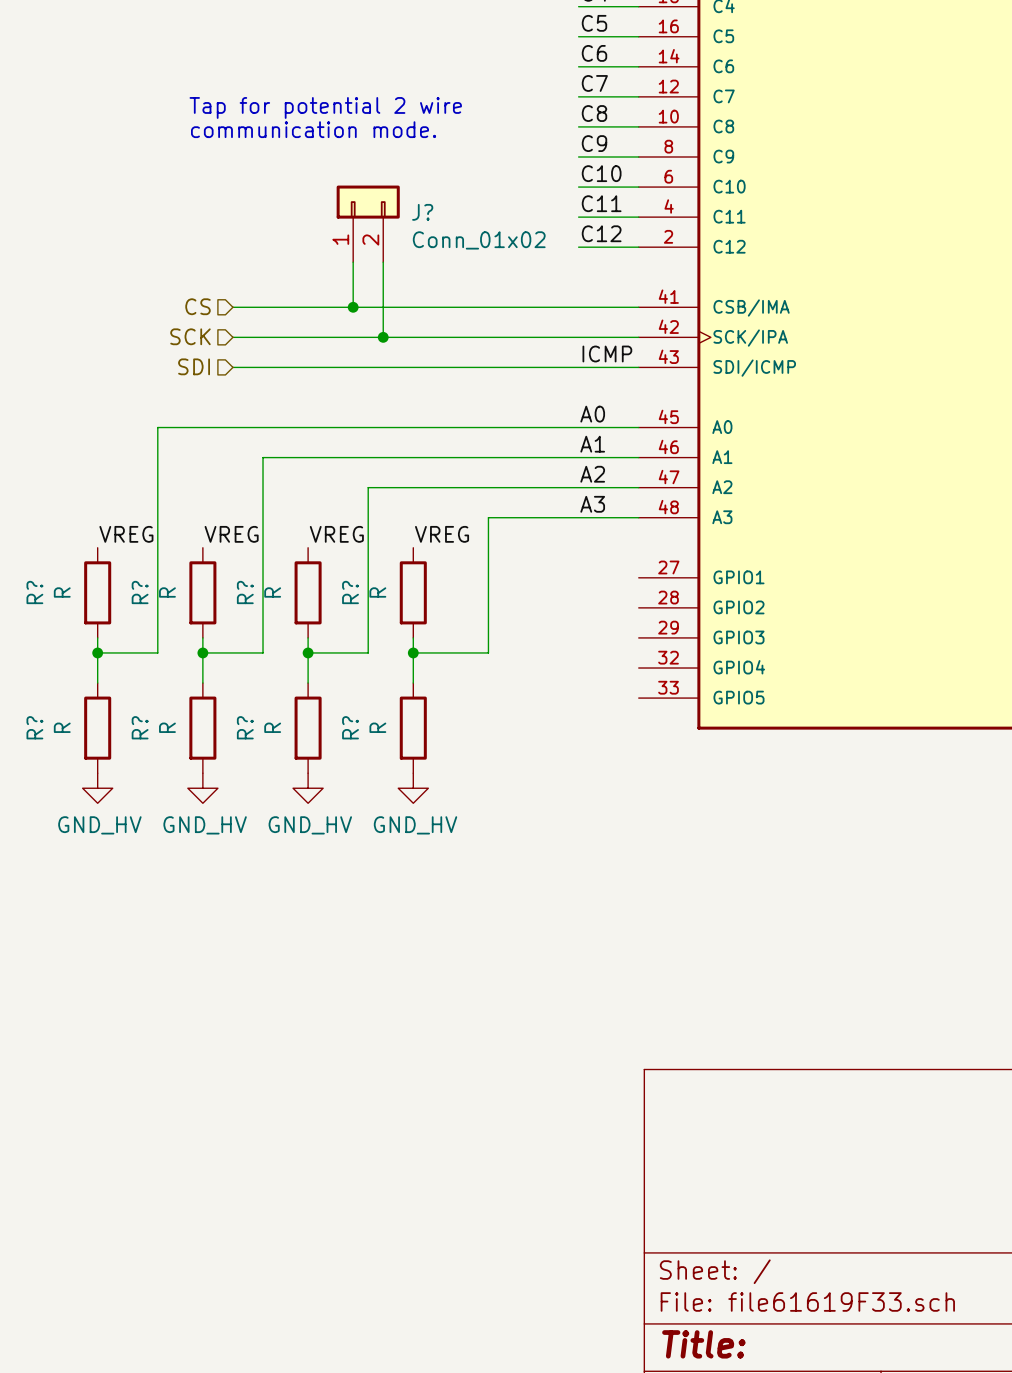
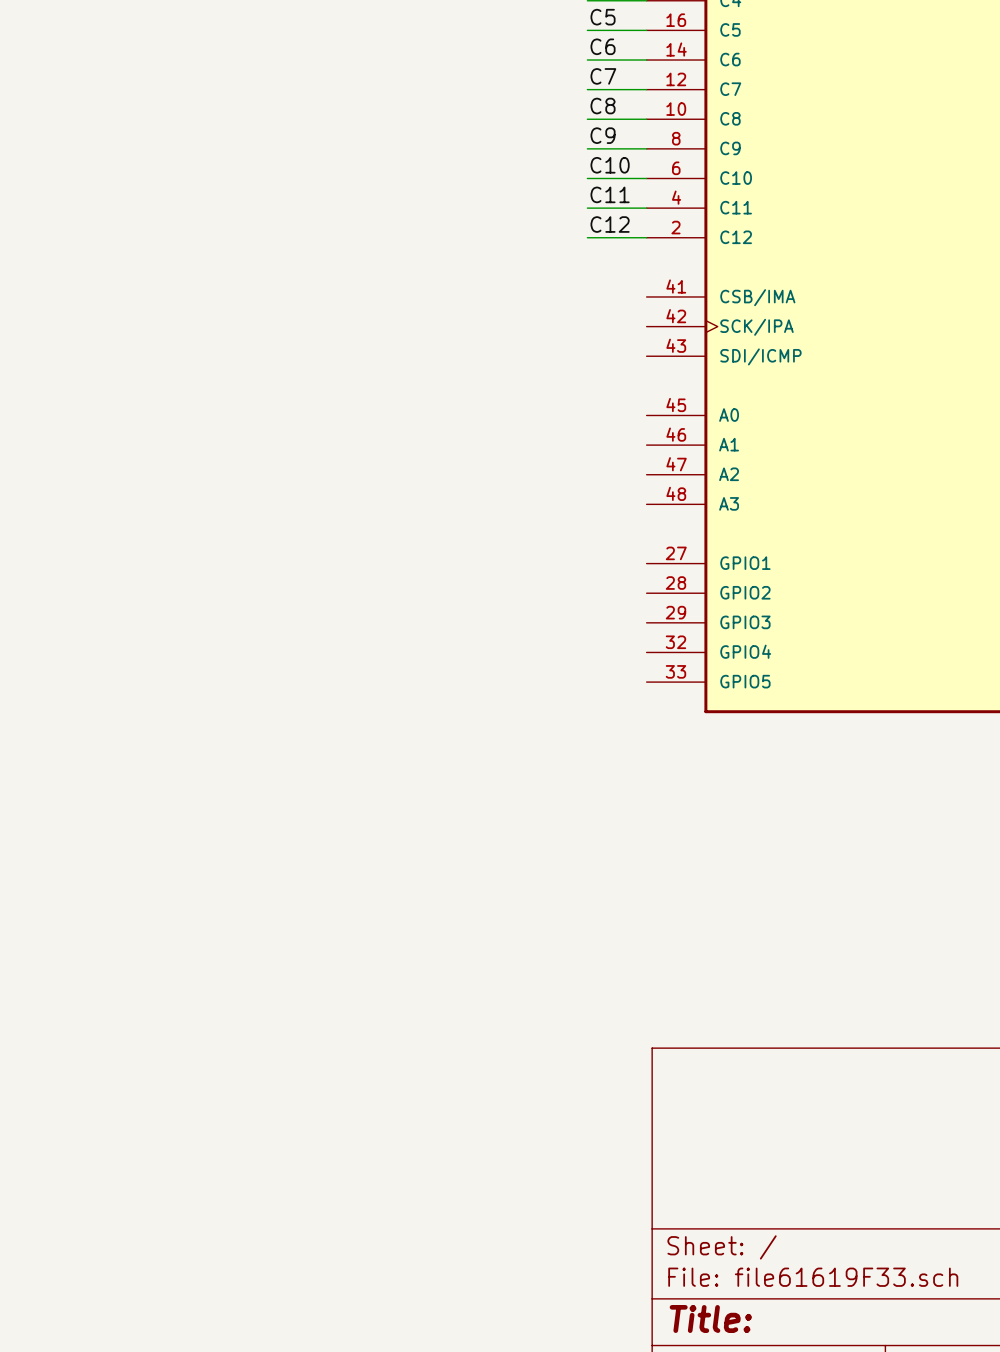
text: Tap for potential 2 wire (325, 107) -> none
text: communication mode. (313, 129) -> none
J?: Conn_01x02 (368, 223) -> none
wire: (353, 262) (353, 307) -> none
wire: (383, 262) (383, 337) -> none
hierarchical label: CS (198, 306) -> none
wire: (232, 307) (638, 307) -> none
junction: (353, 307) -> none
hierarchical label: SCK (190, 336) -> none
wire: (232, 337) (638, 337) -> none
junction: (383, 337) -> none
label: ICMP (607, 354) -> none
hierarchical label: SDI (194, 366) -> none
wire: (232, 367) (638, 367) -> none
label: A0 (592, 414) -> none
wire: (638, 427) (157, 427) (157, 652) (97, 652) -> none
label: A1 (592, 444) -> none
wire: (638, 457) (263, 457) (263, 652) (202, 652) -> none
label: A2 (592, 474) -> none
wire: (638, 487) (368, 487) (368, 652) (308, 652) -> none
label: A3 (592, 504) -> none
wire: (638, 517) (488, 517) (488, 652) (413, 652) -> none
label: VREG (126, 534) -> none
label: VREG (231, 534) -> none
label: VREG (336, 534) -> none
label: VREG (442, 534) -> none
R?: R (97, 592) -> none
R?: R (202, 592) -> none
R?: R (308, 592) -> none
R?: R (413, 592) -> none
wire: (97, 637) (97, 683) -> none
wire: (202, 637) (202, 683) -> none
wire: (308, 637) (308, 683) -> none
wire: (413, 637) (413, 683) -> none
junction: (97, 652) -> none
junction: (202, 652) -> none
junction: (308, 652) -> none
junction: (413, 652) -> none
R?: R (97, 728) -> none
R?: R (202, 728) -> none
R?: R (308, 728) -> none
R?: R (413, 728) -> none
power symbol: GND_HV (97, 788) -> none
power symbol: GND_HV (202, 788) -> none
power symbol: GND_HV (308, 788) -> none
power symbol: GND_HV (413, 788) -> none

